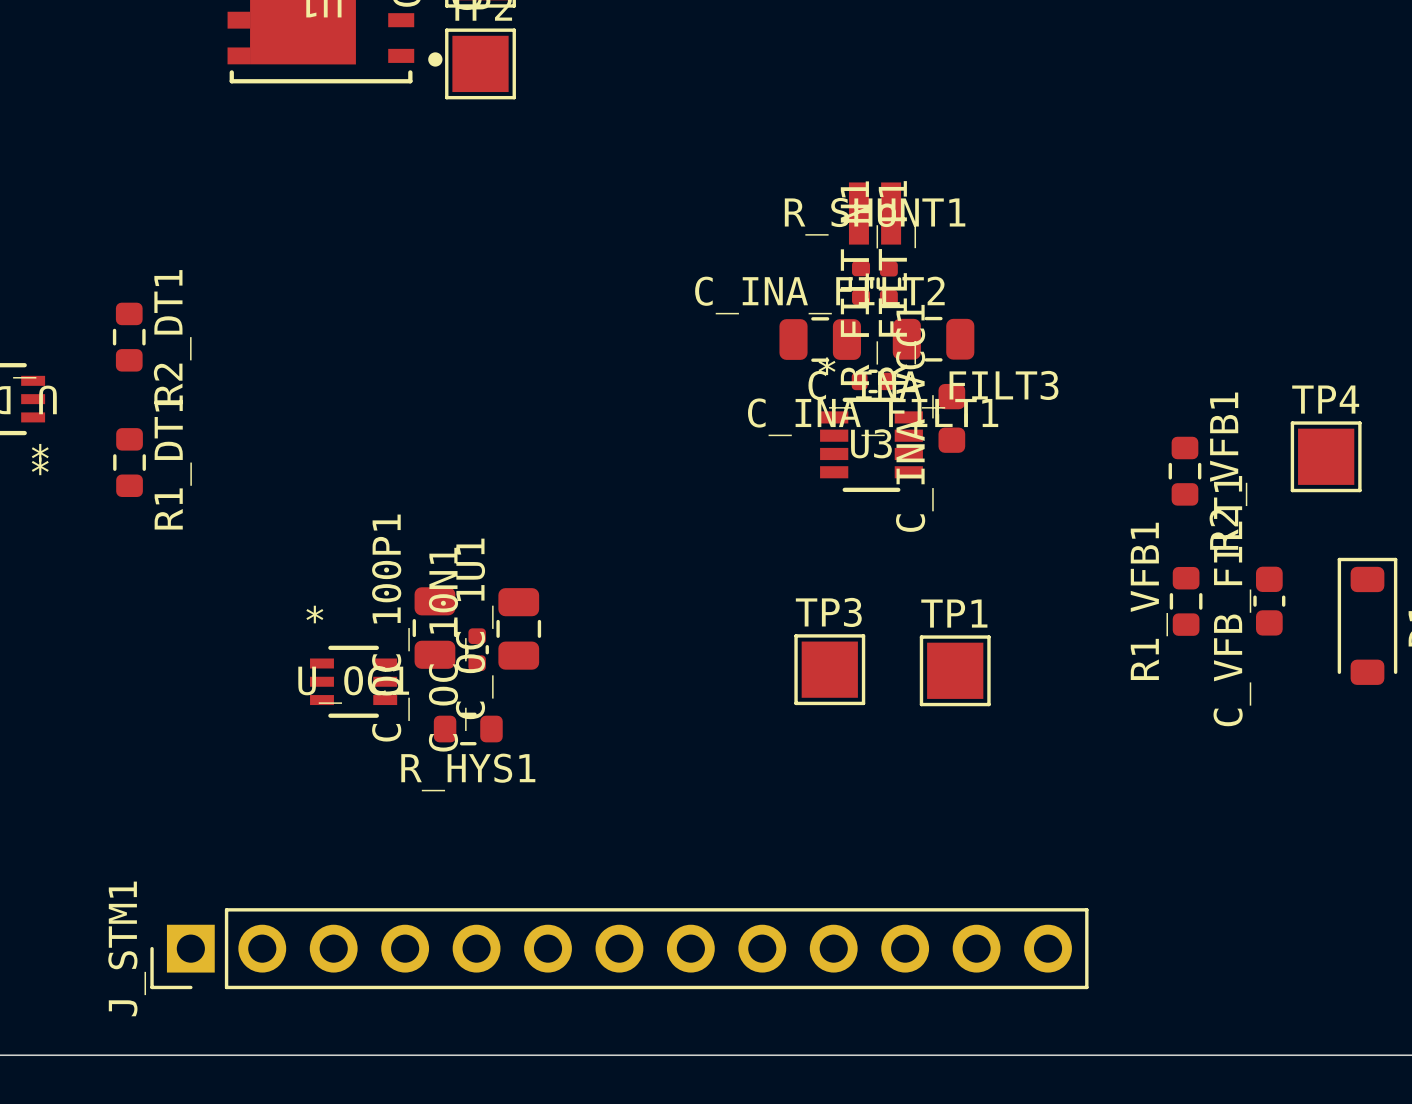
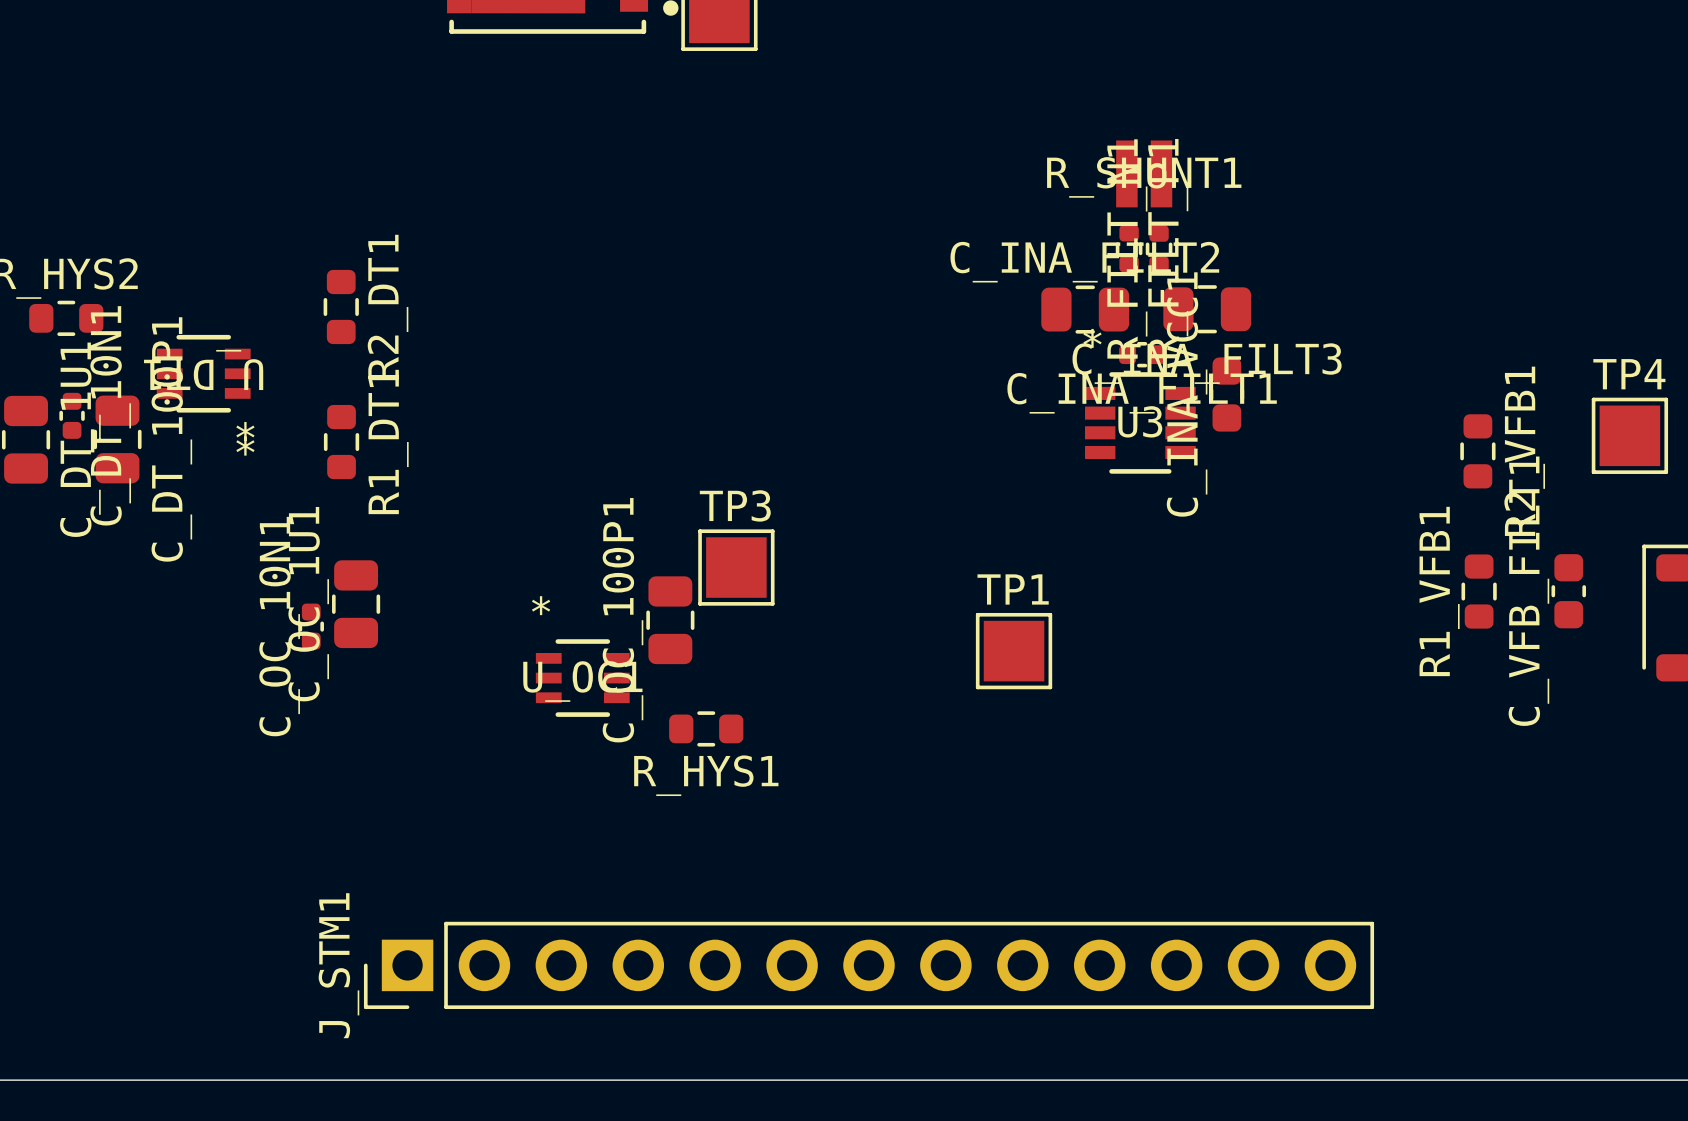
C_OC_1U1 position: (518, 628) -> (356, 604)
C_OC_10N1 position: (477, 649) -> (311, 626)
TP3 position: (829, 669) -> (736, 567)
TP1 position: (955, 670) -> (1014, 651)

